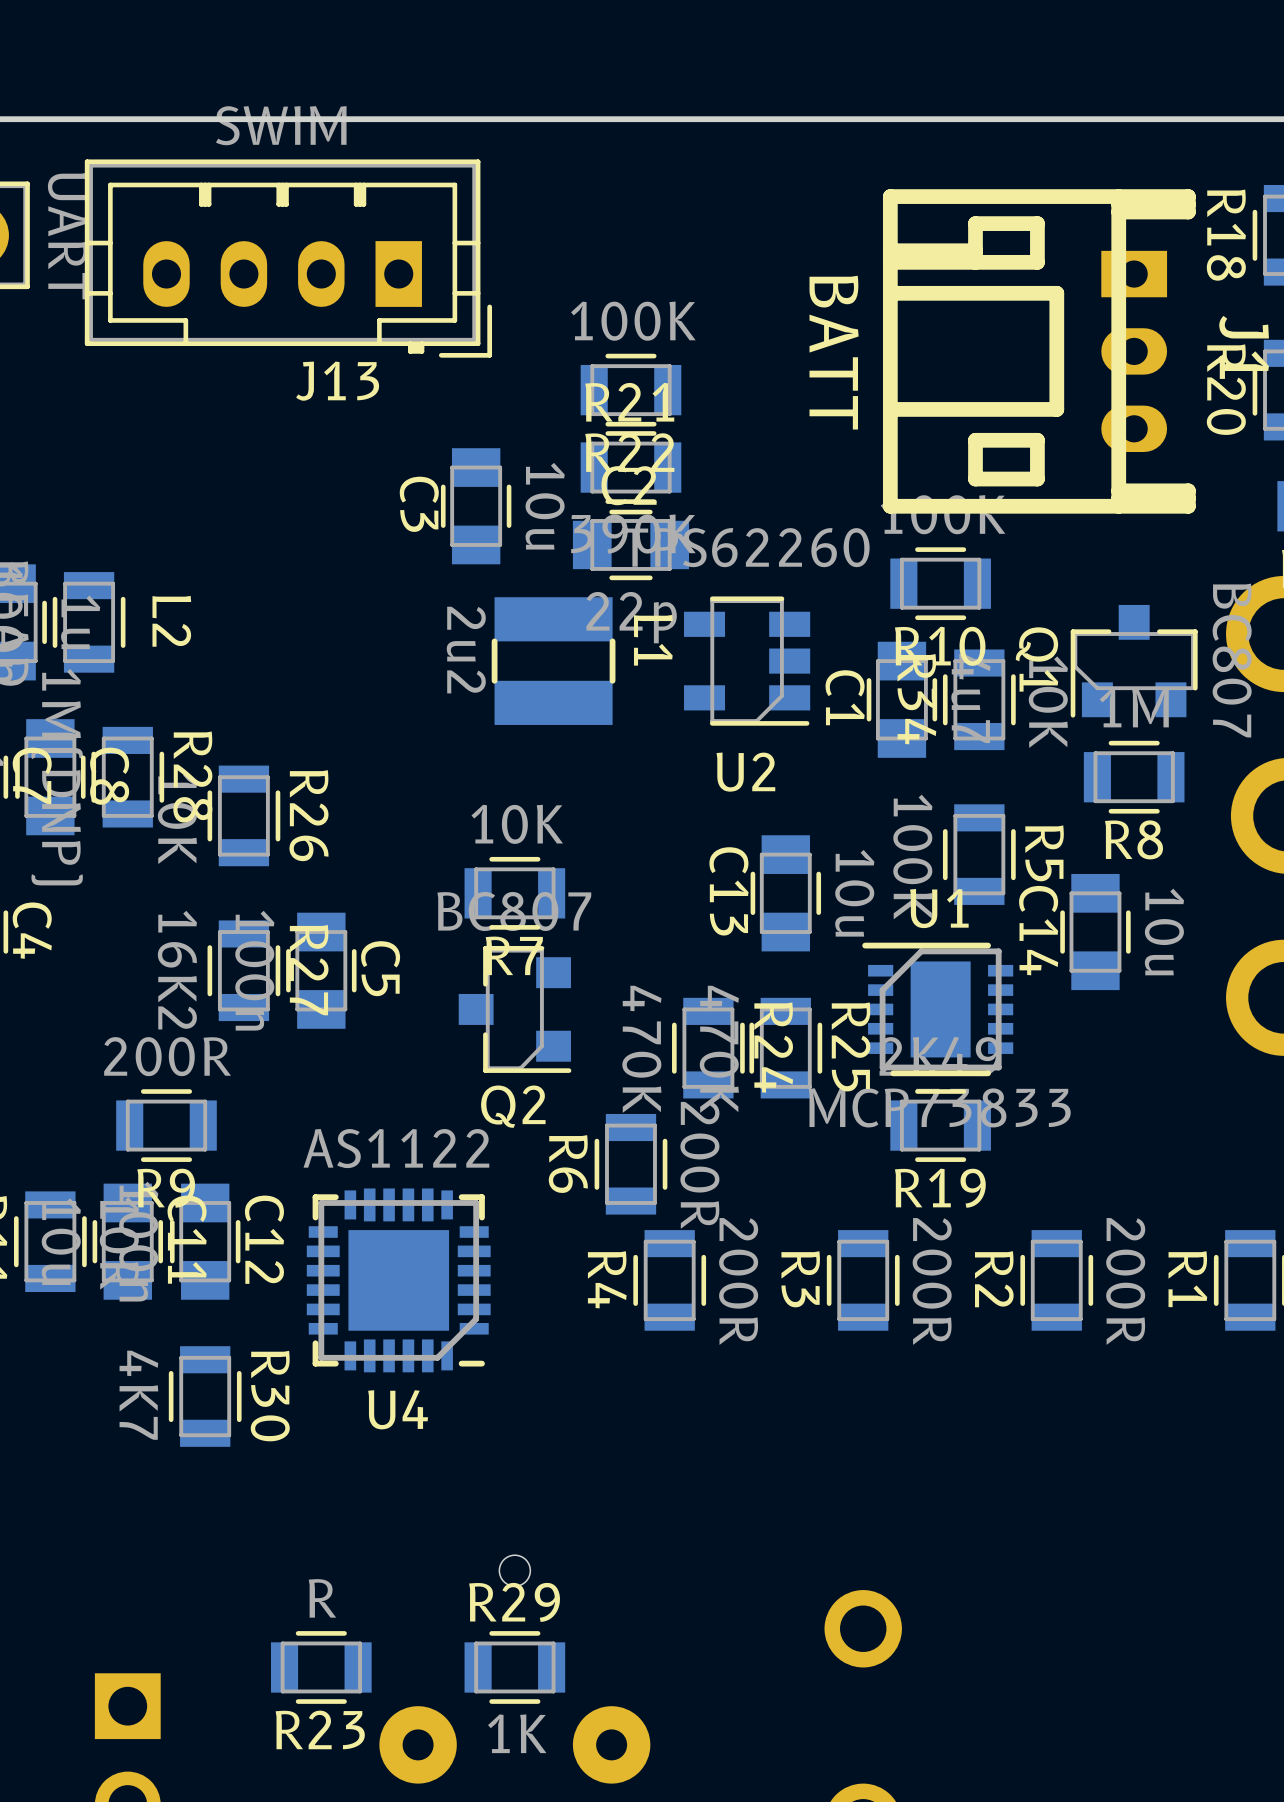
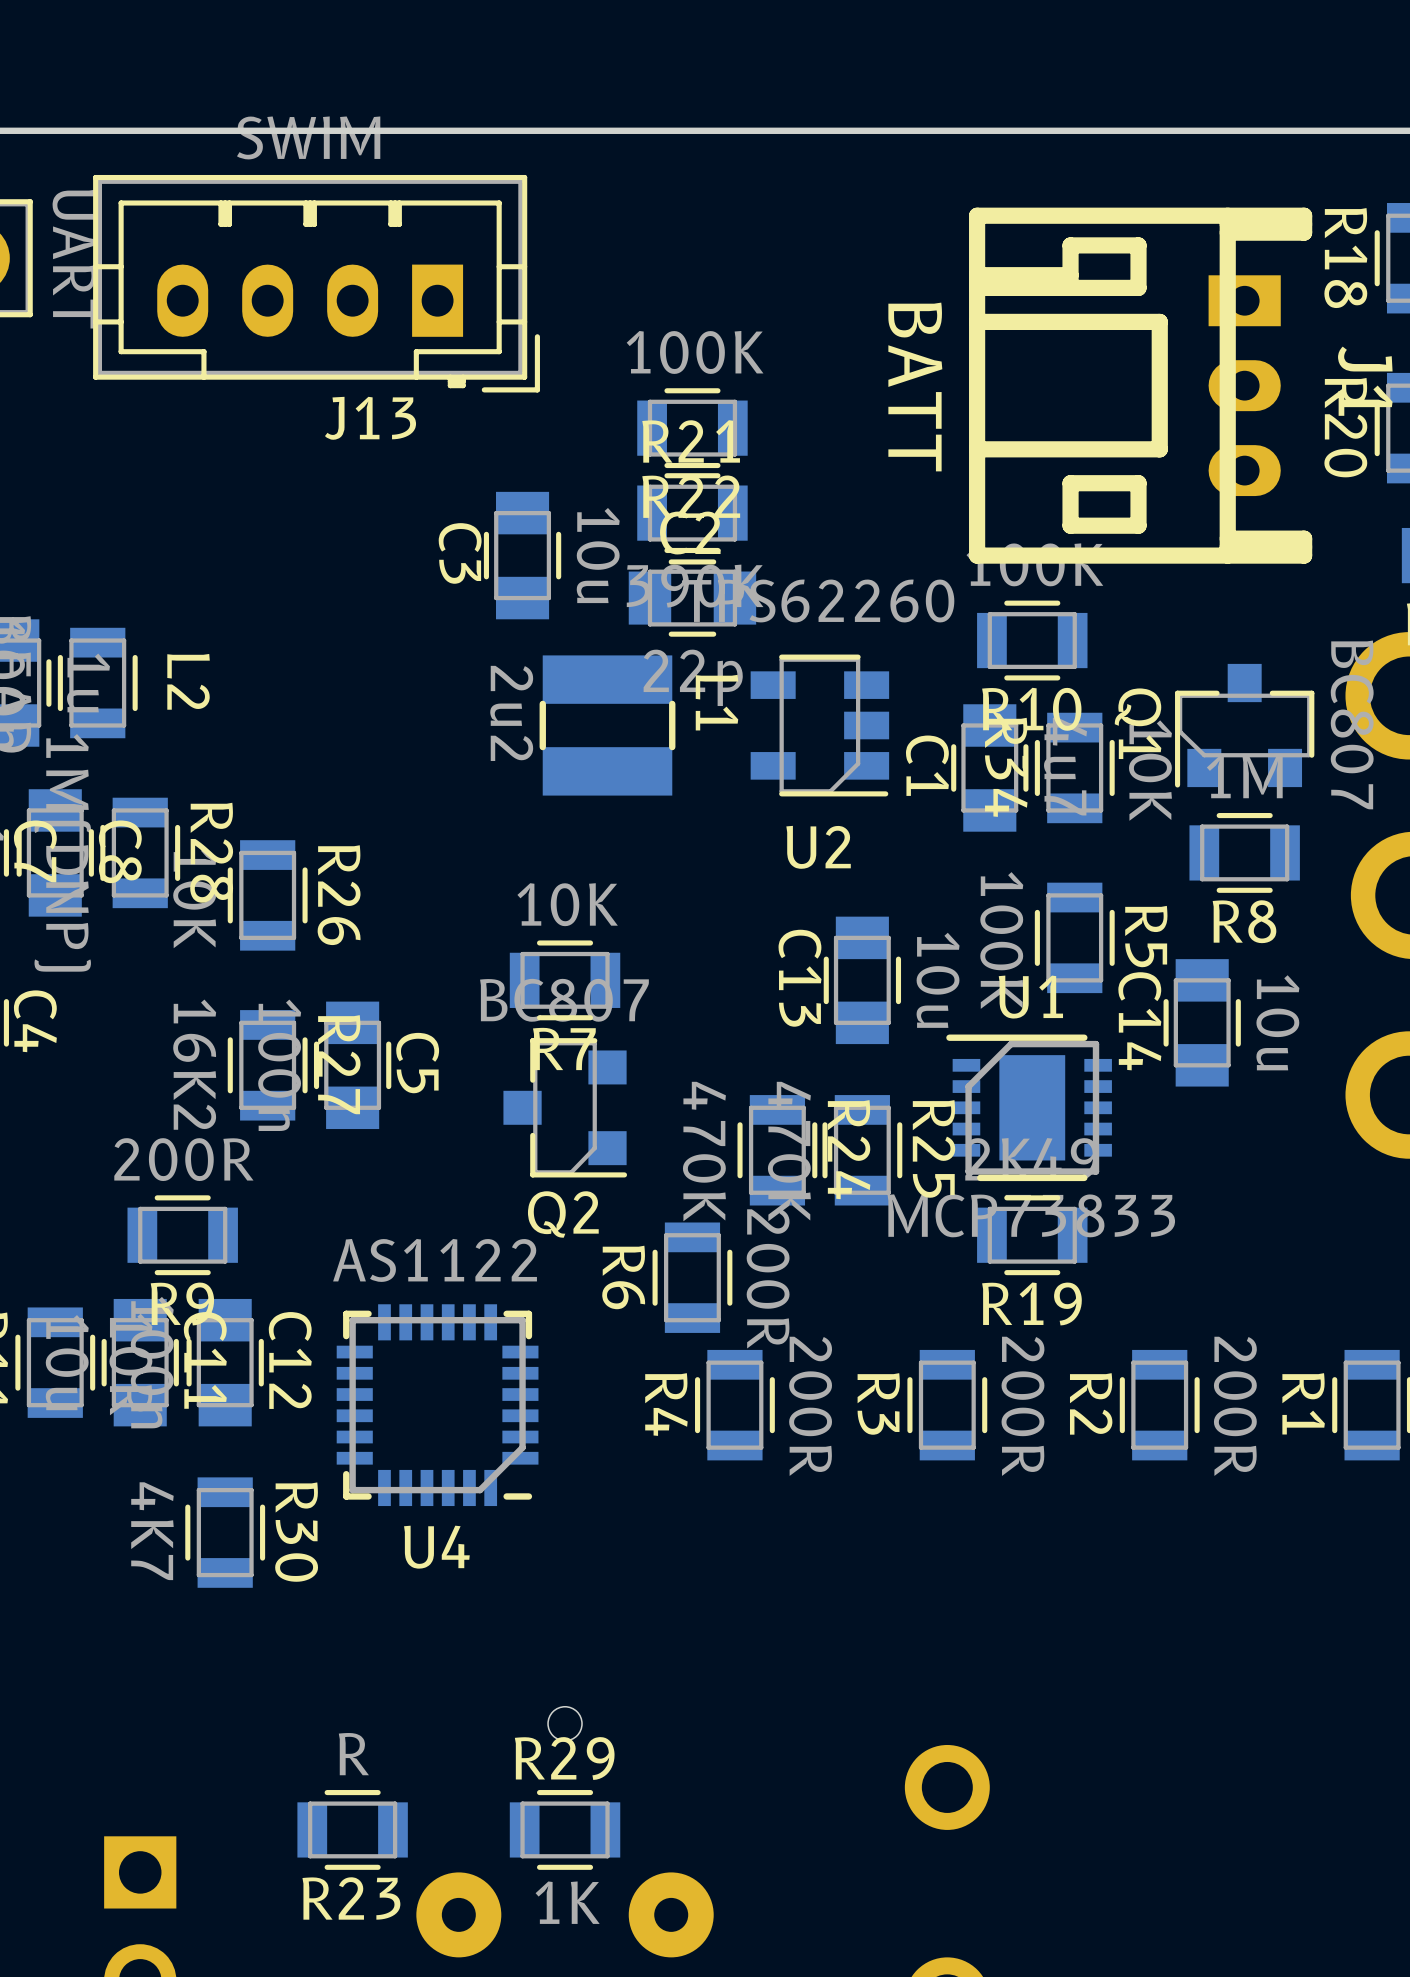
U4 footprint: [306, 1188, 491, 1373] -> [336, 1304, 539, 1507]

